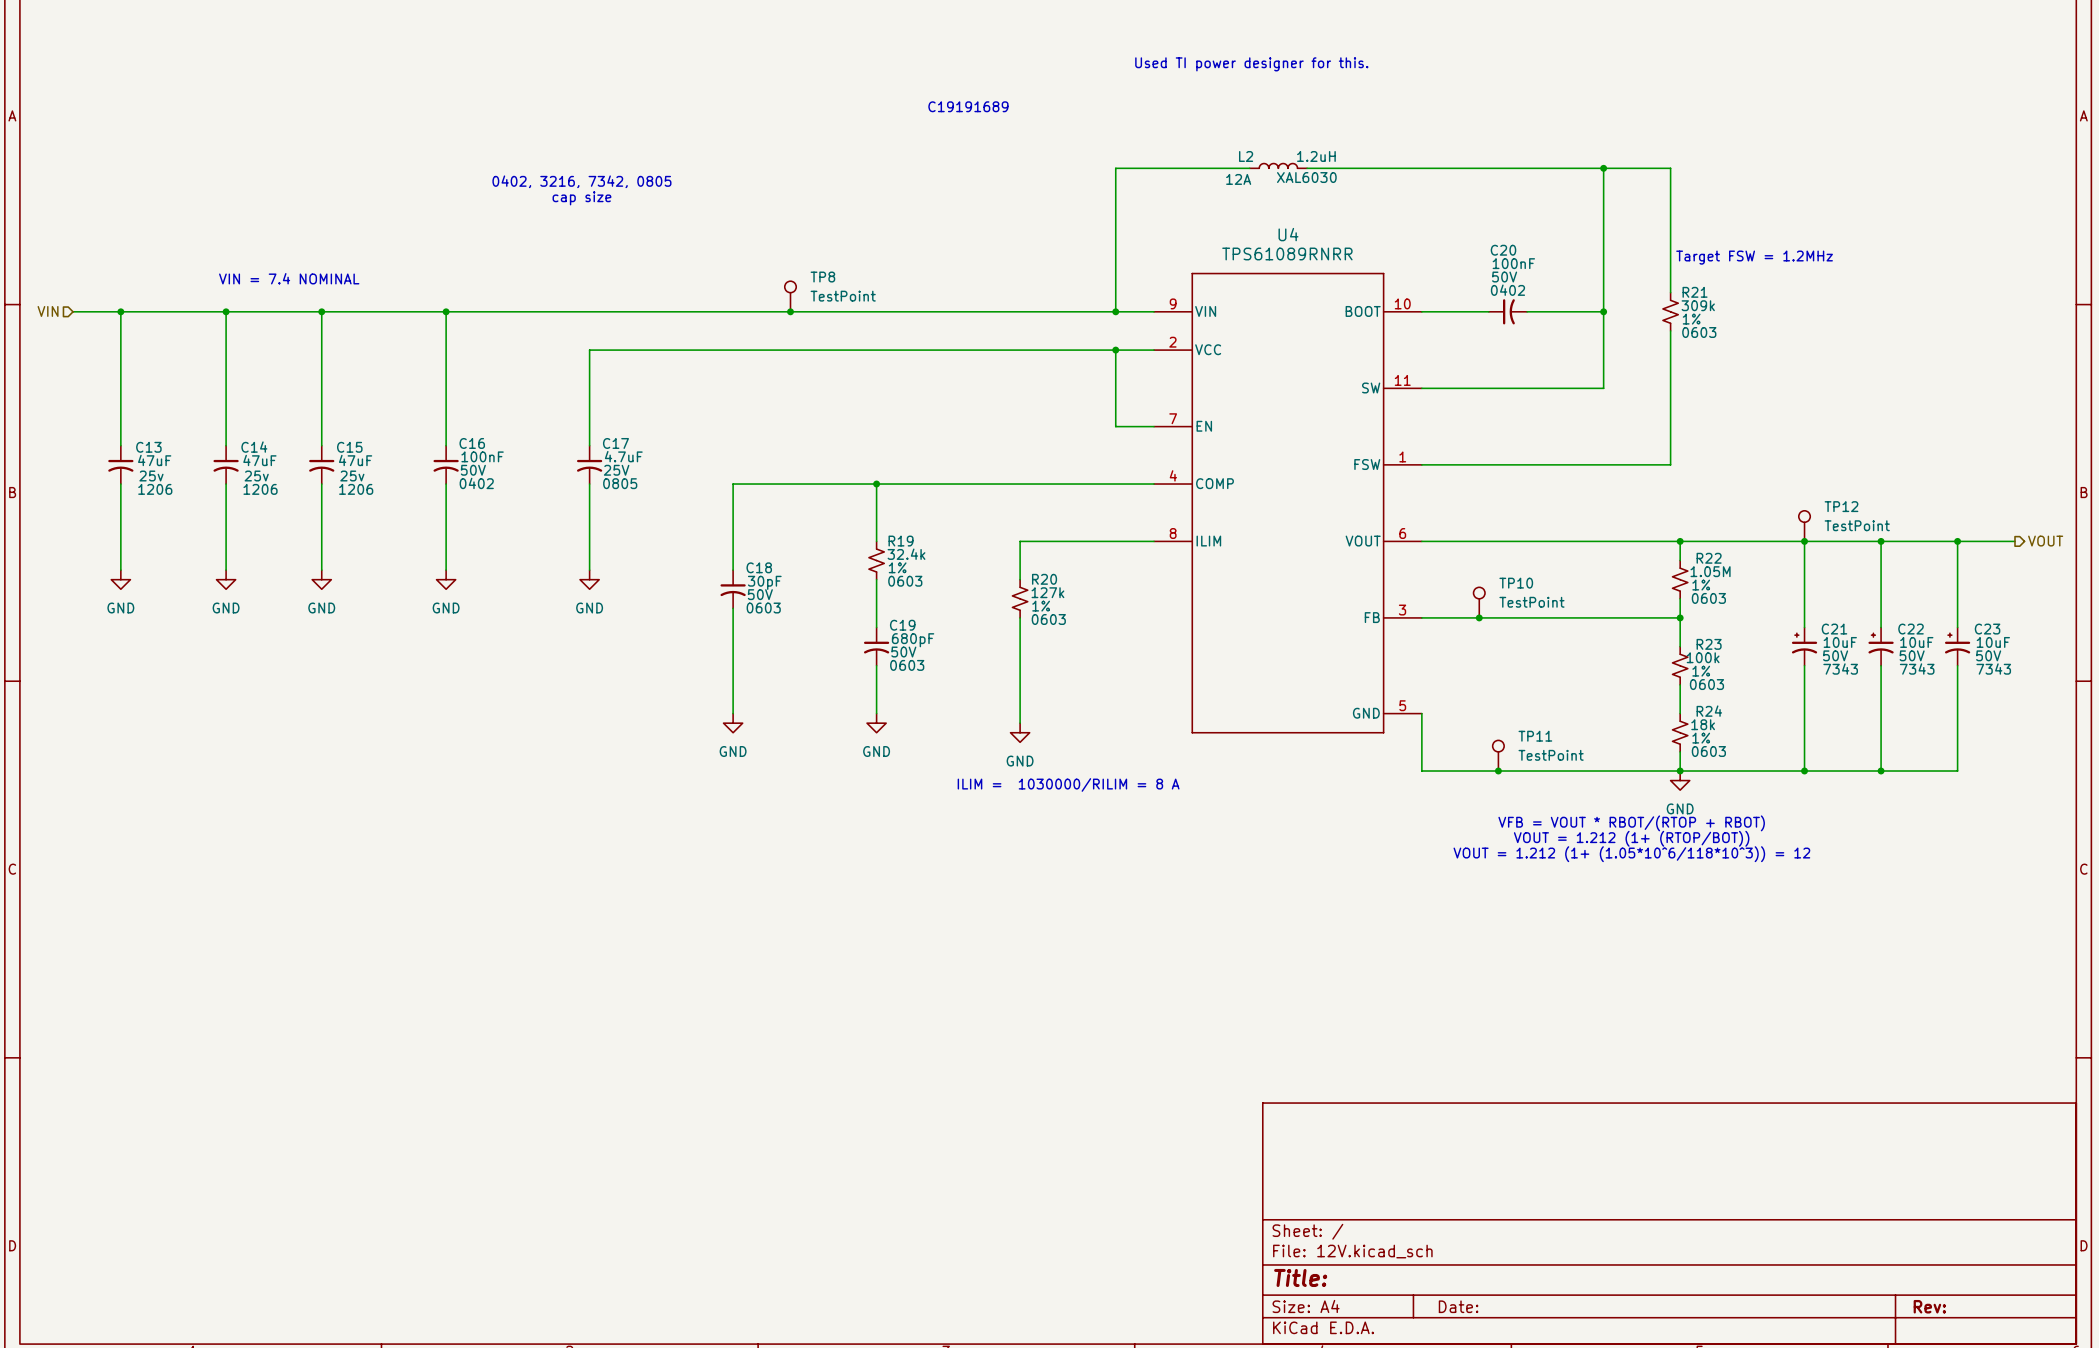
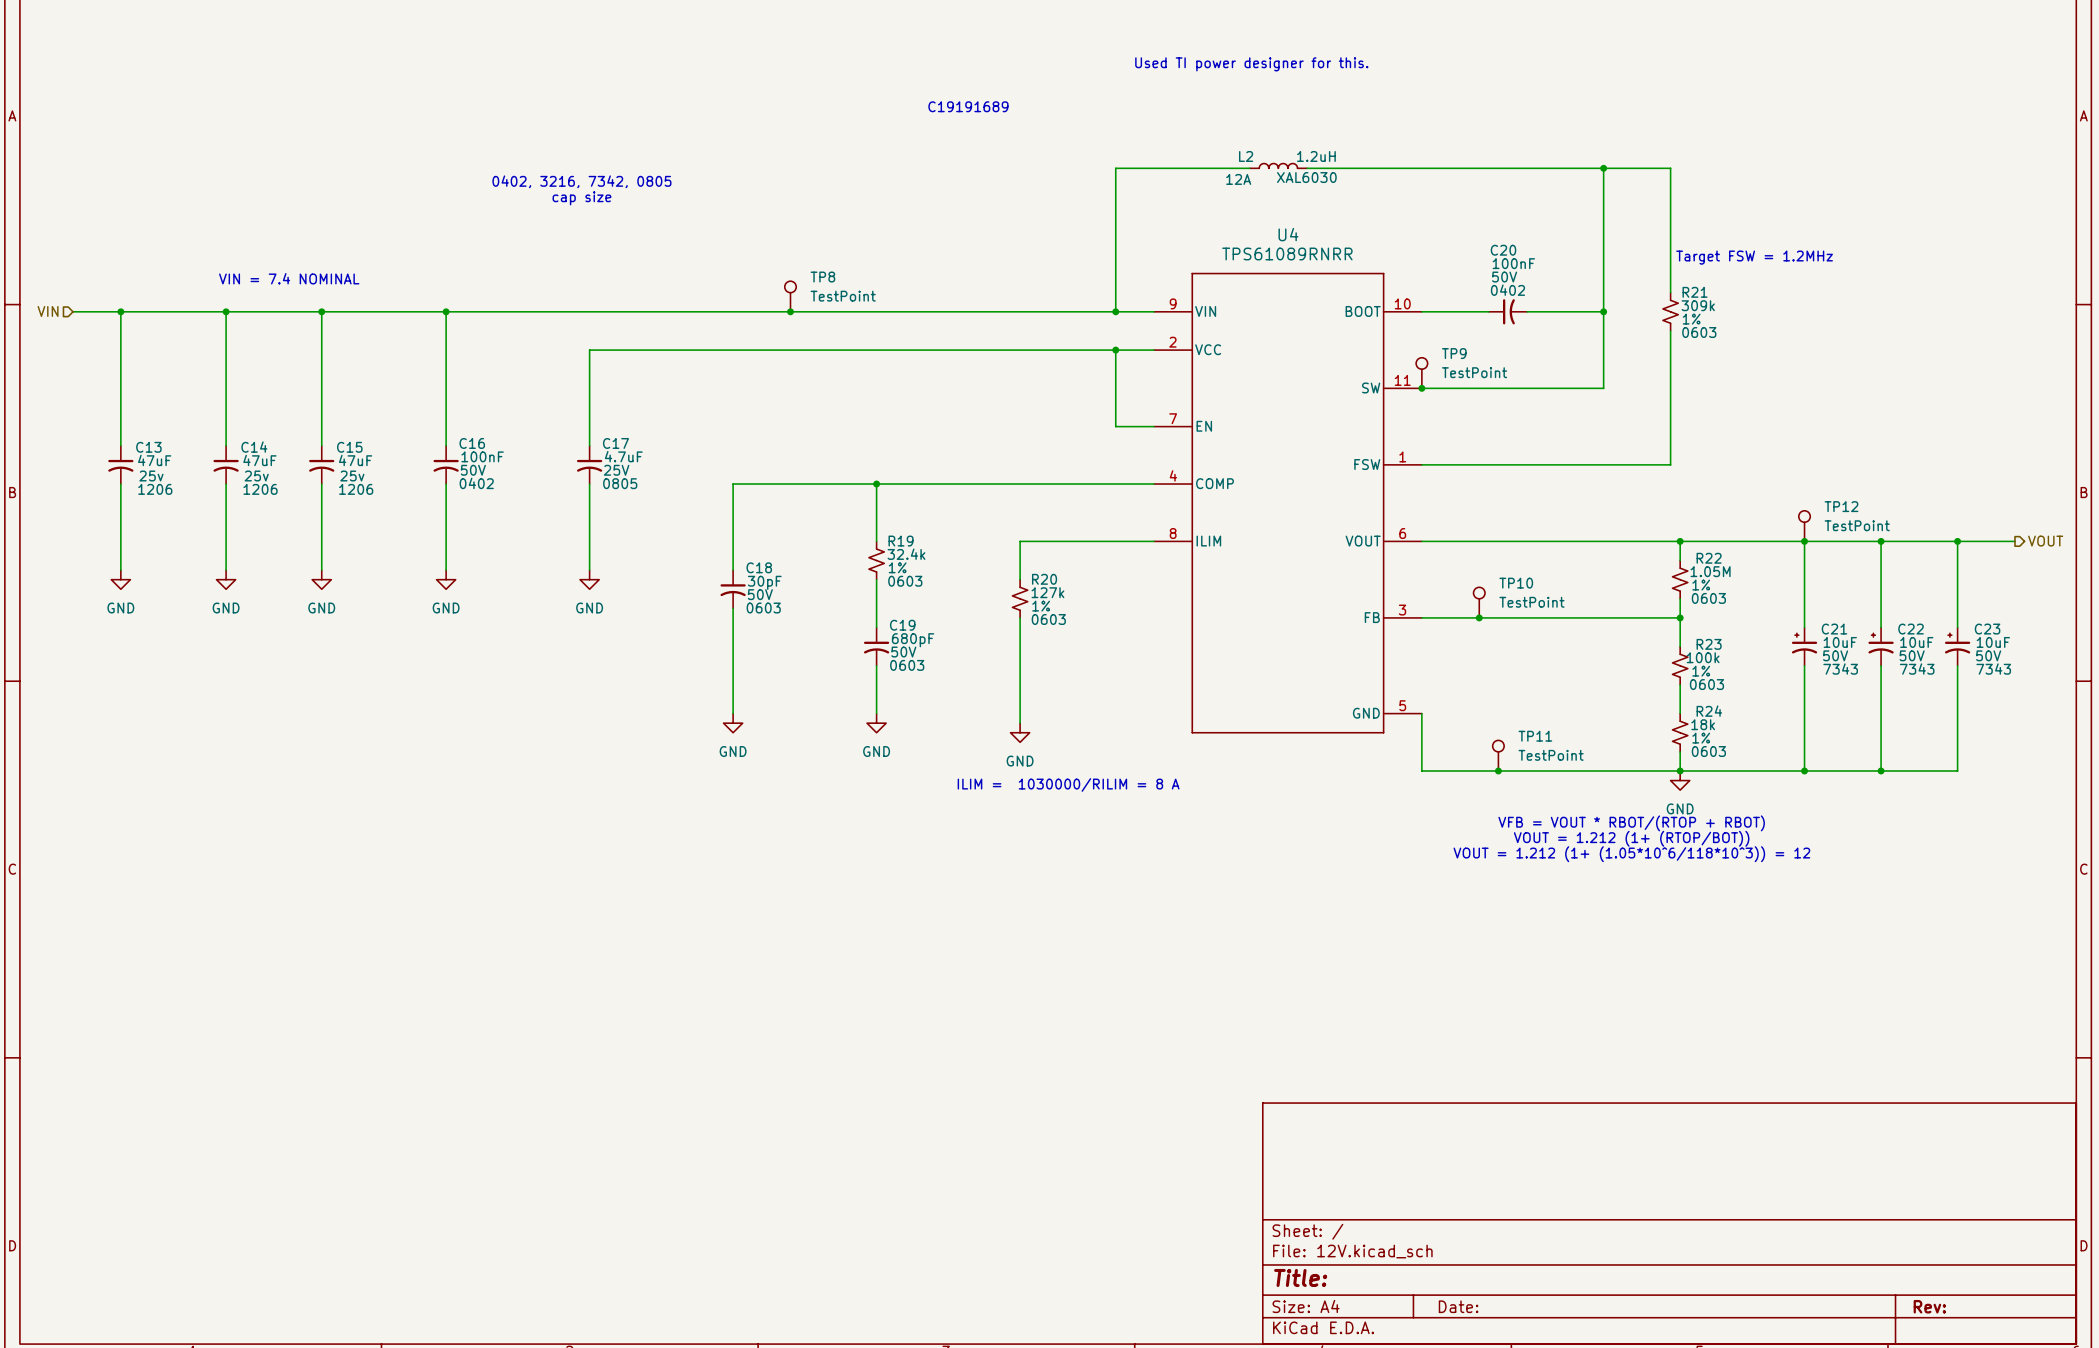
TP9: none -> TestPoint (1421, 373)
junction: none -> (1421, 388)

